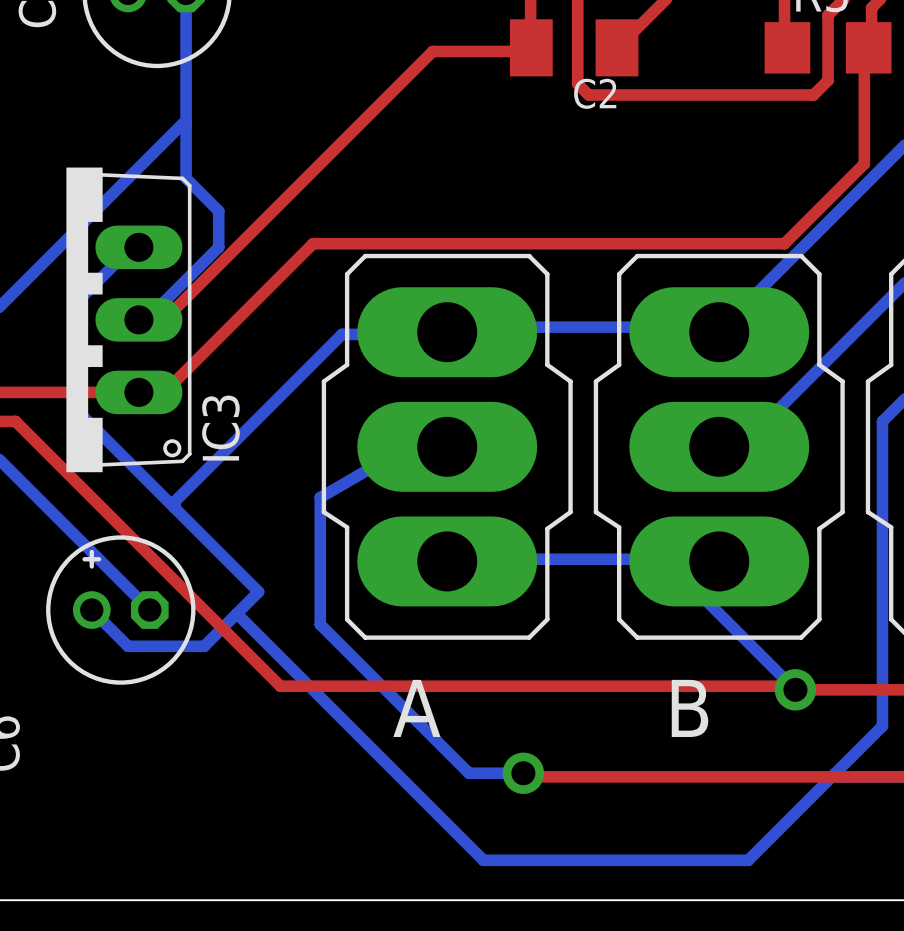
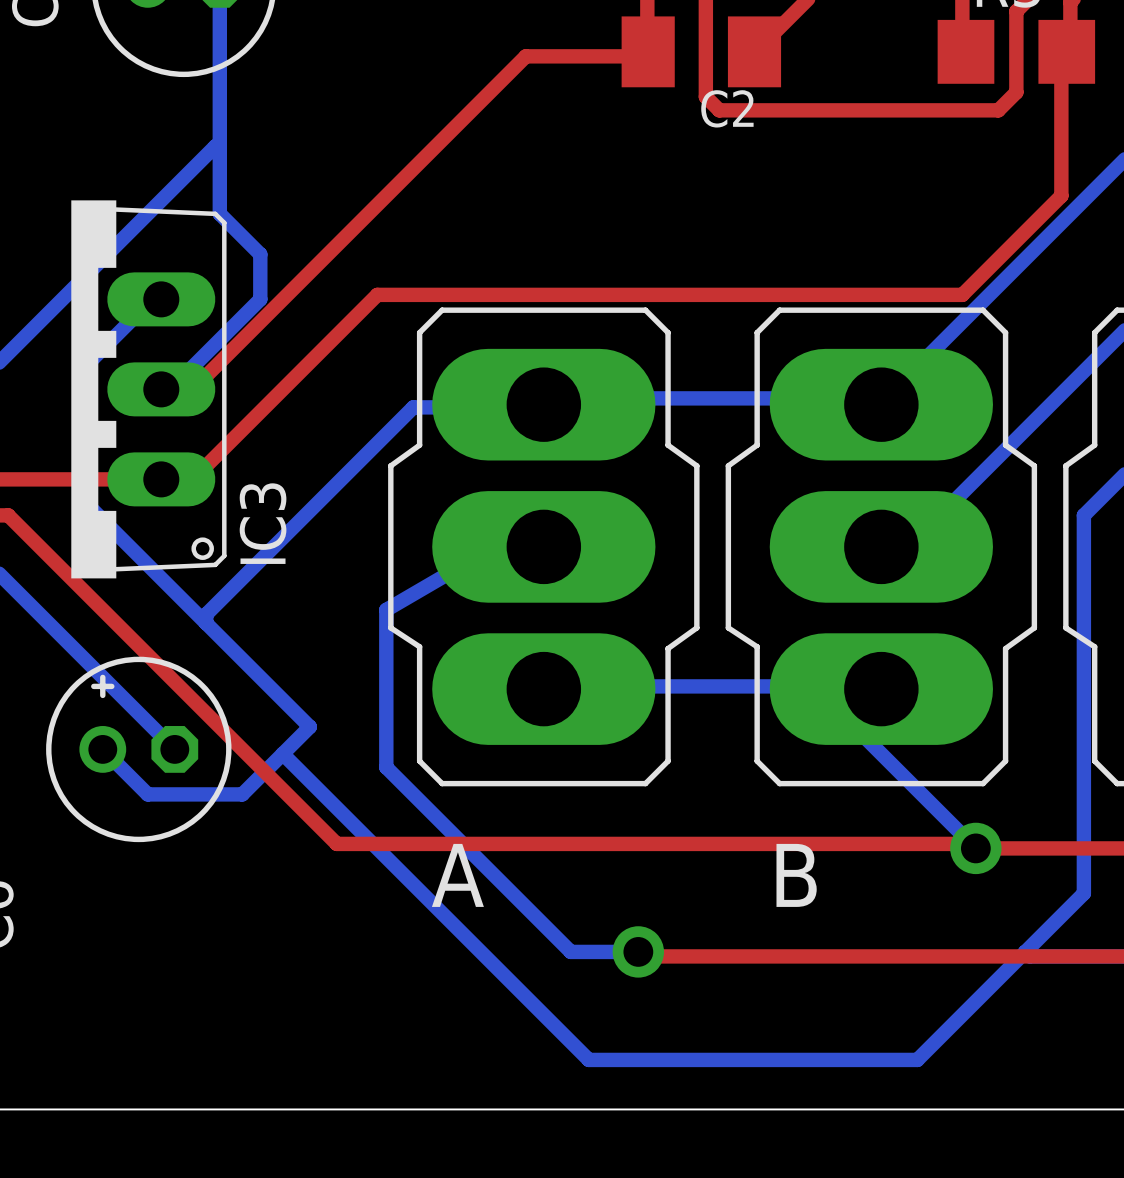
A name position: A (416, 708) -> A (457, 875)
B name position: B (690, 708) -> B (796, 875)

